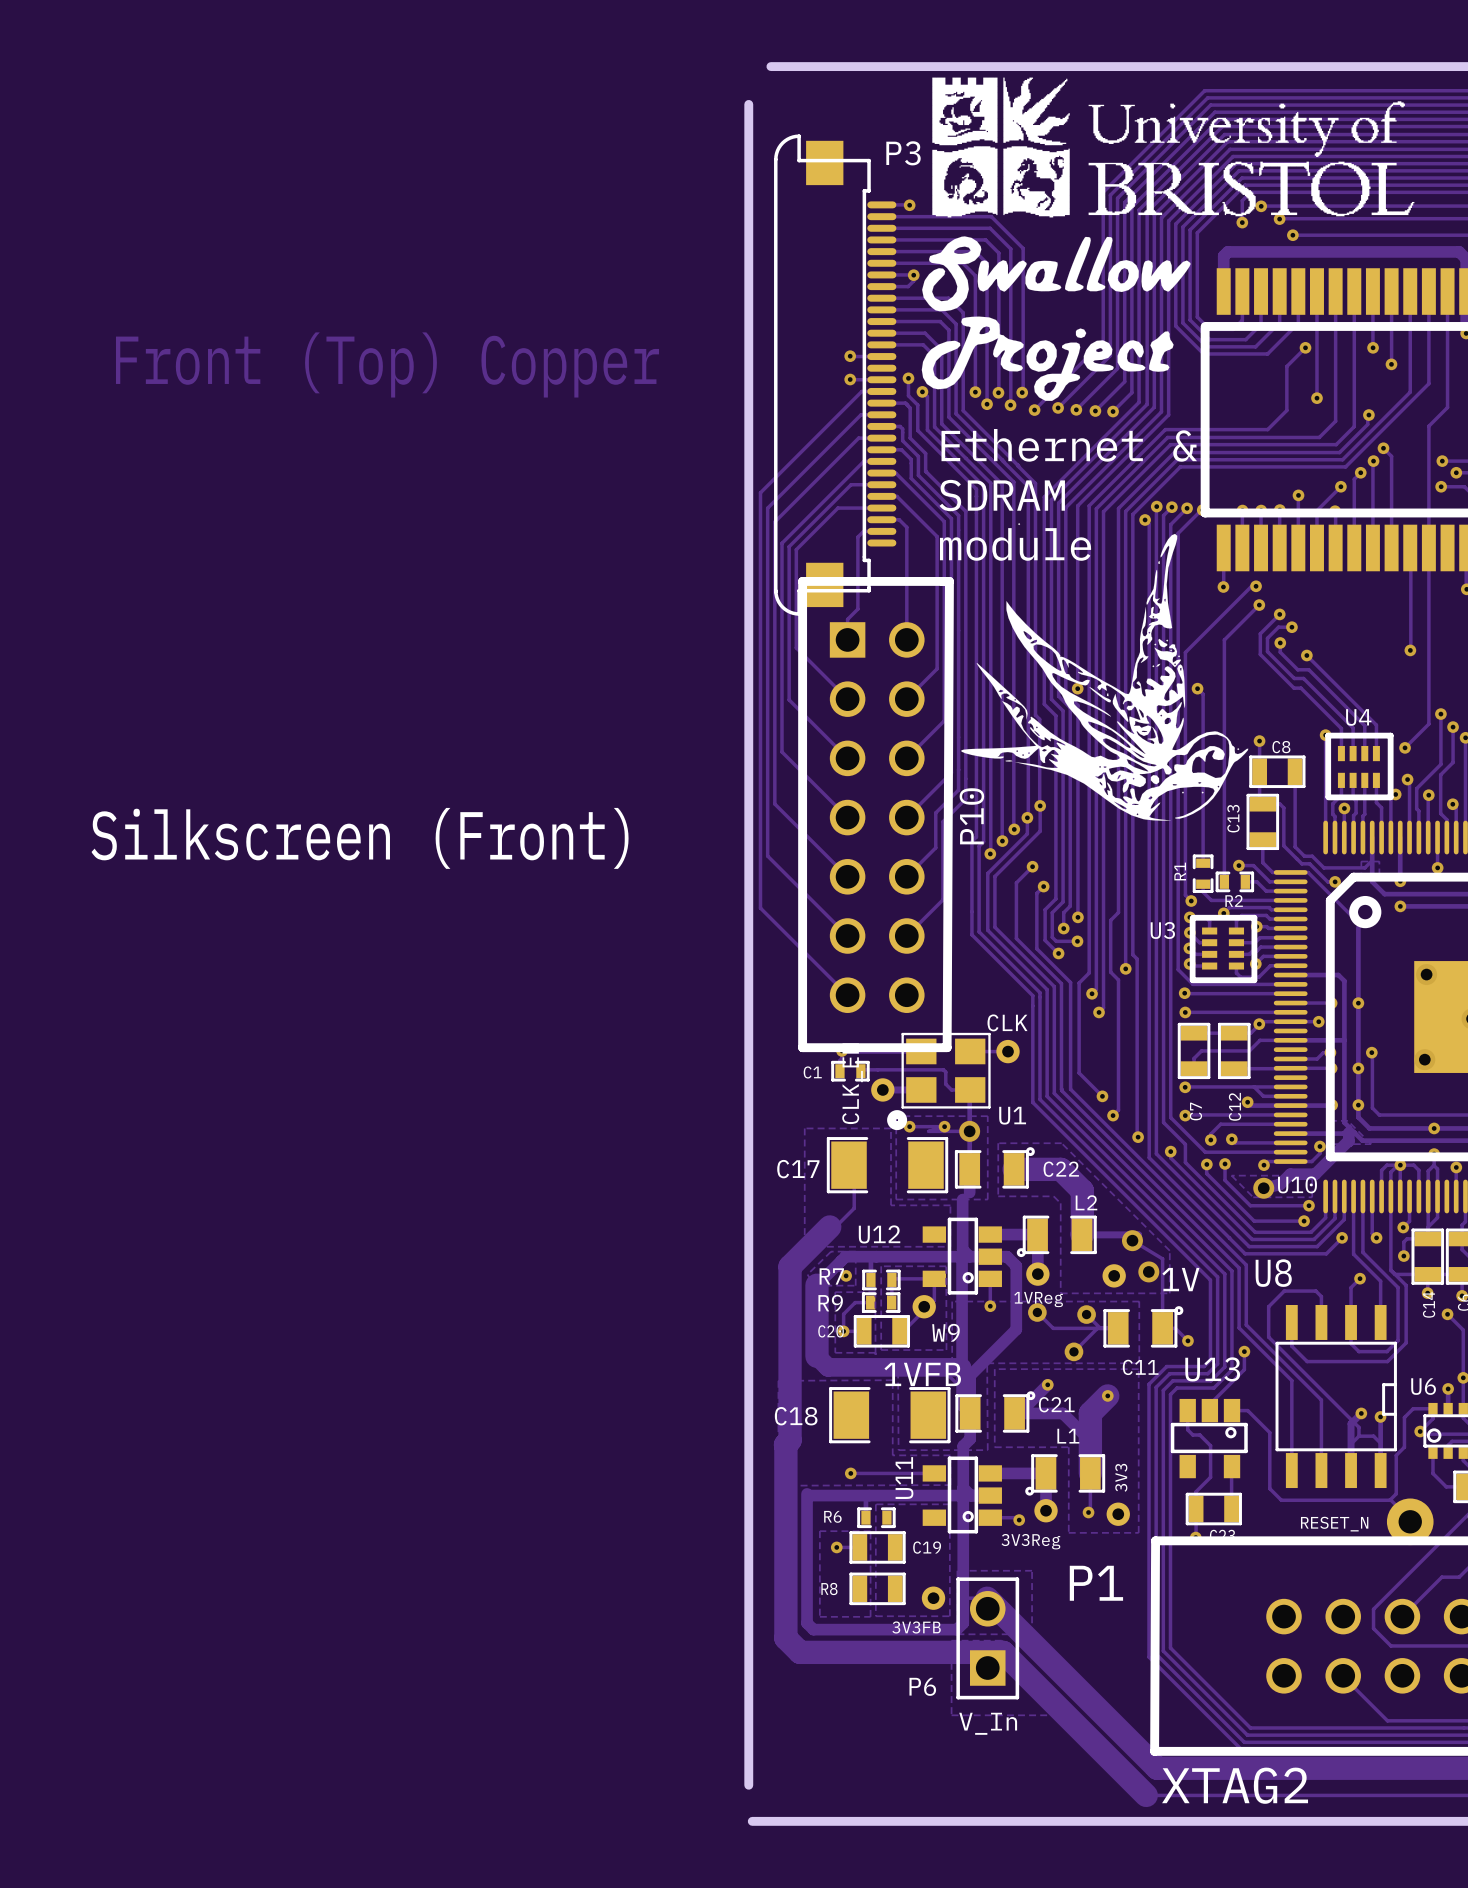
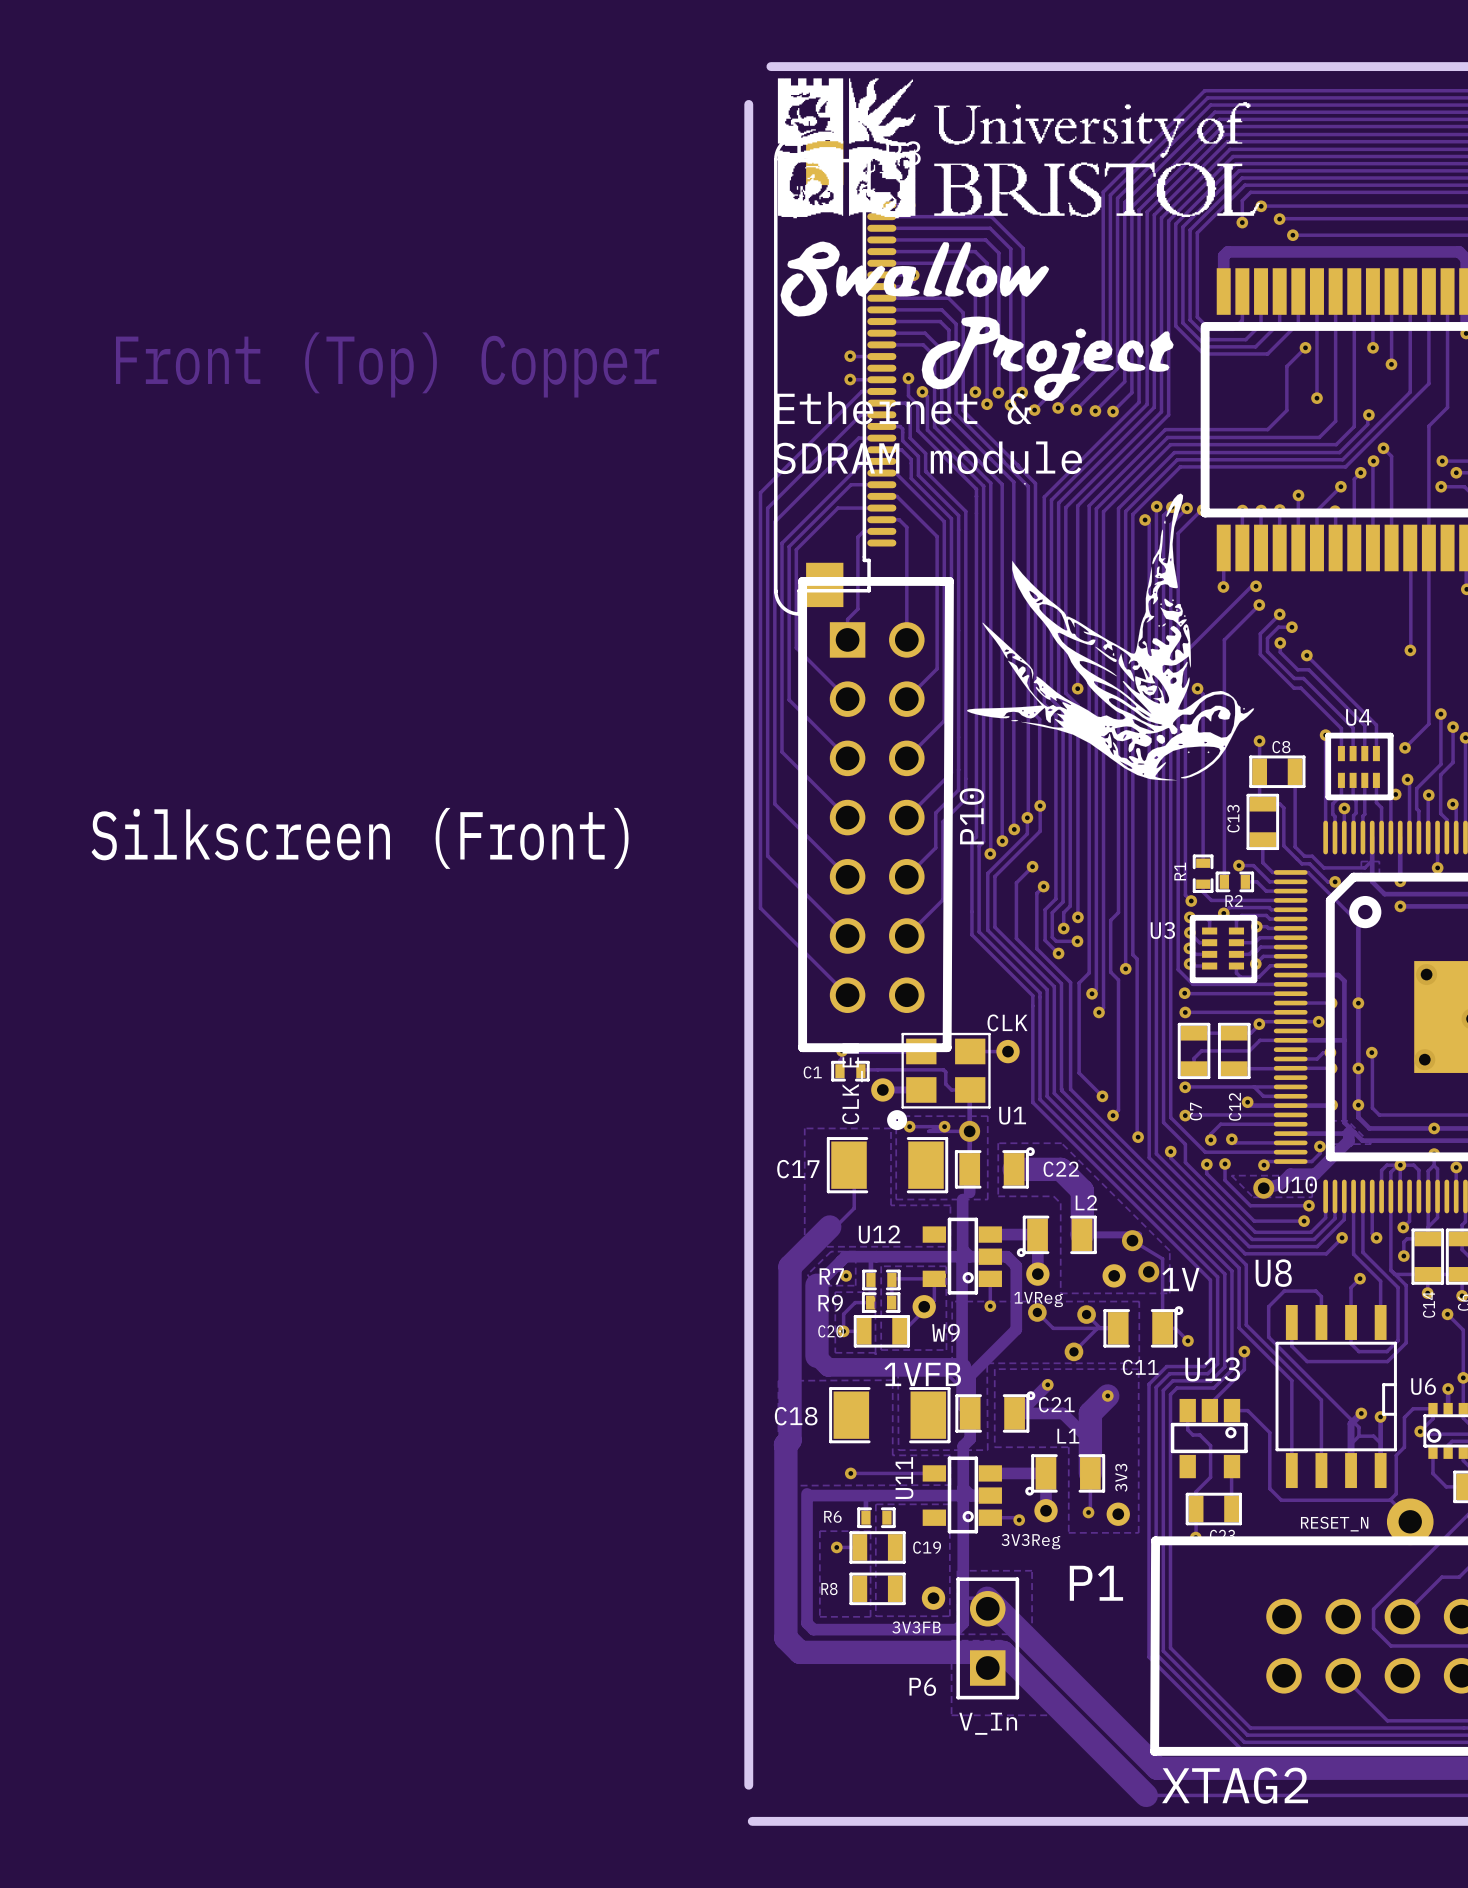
drawing position: (1173, 147) -> (1018, 148)
drawing position: (1056, 273) -> (914, 279)
text position: Ethernet & (1069, 445) -> Ethernet & (903, 408)
text: none -> SDRAM module (927, 457)
text: SDRAM (1002, 495) -> none
text: module (1015, 544) -> none
drawing position: (1104, 671) -> (1110, 631)

